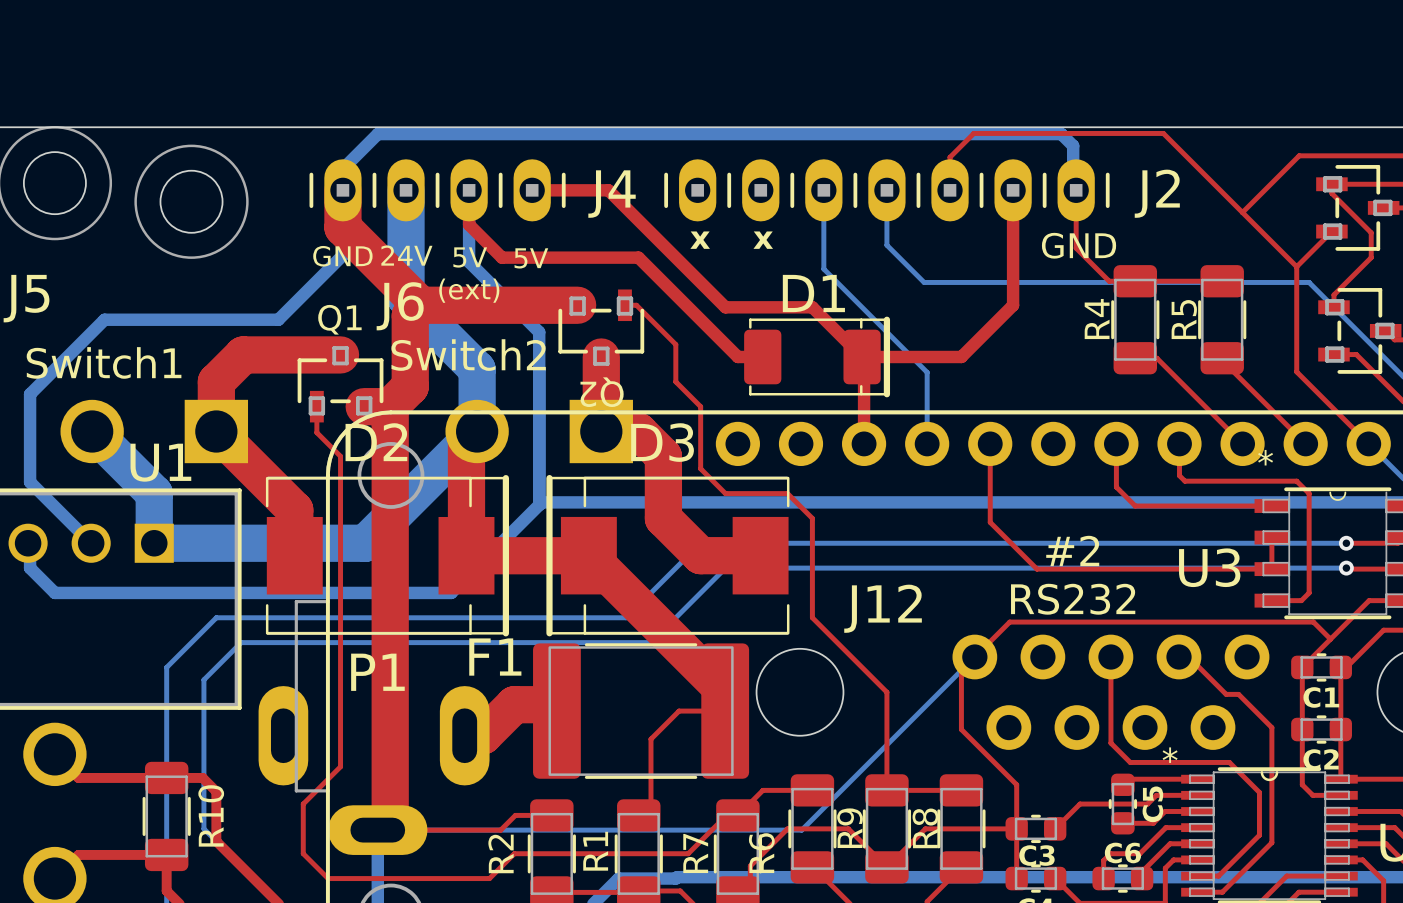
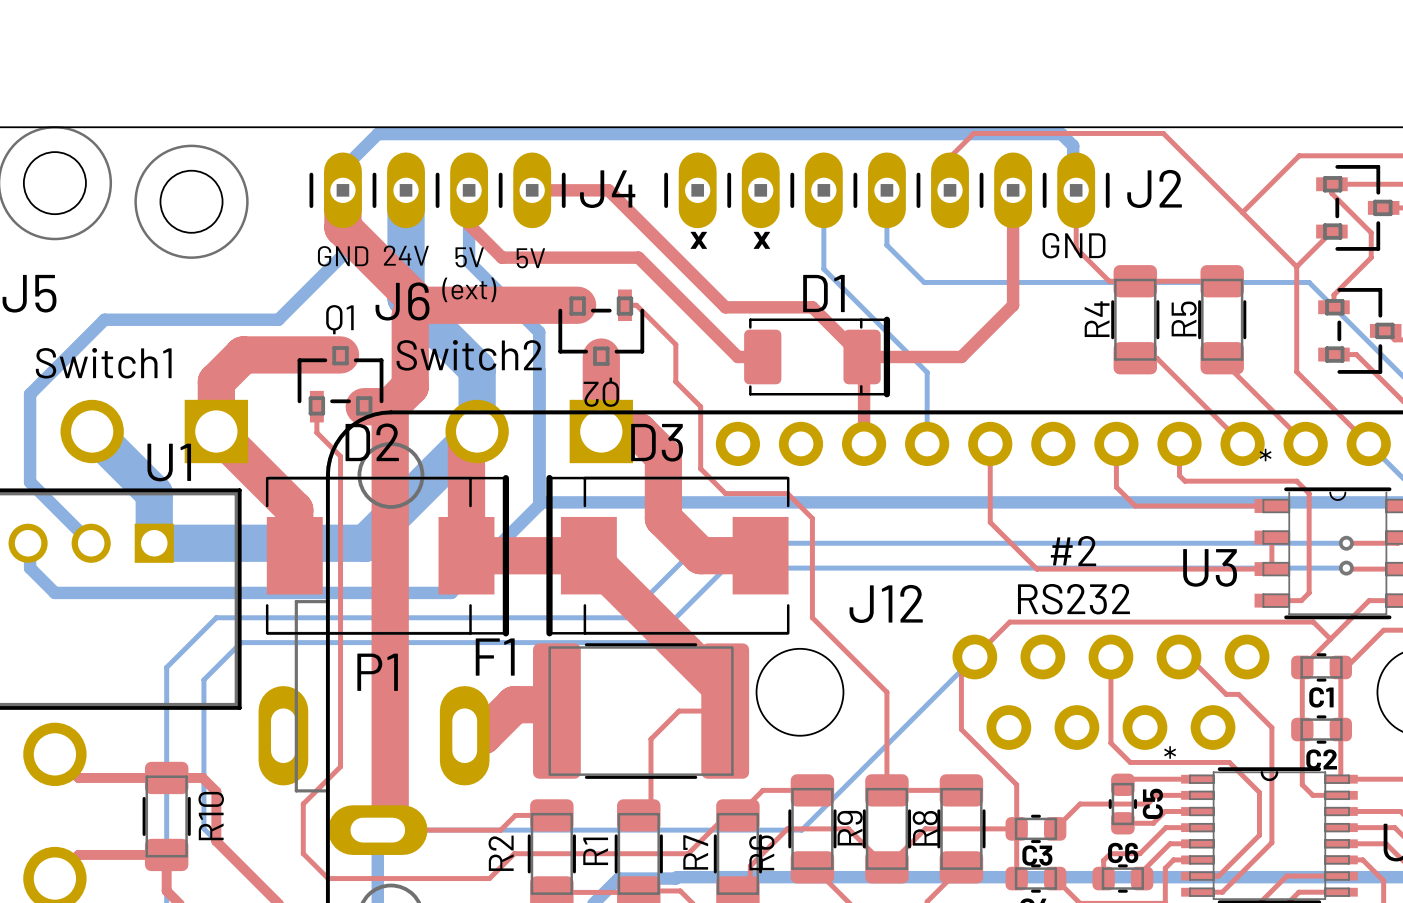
J4 footprint: [309, 159, 566, 222] -> [309, 152, 566, 229]
J2 footprint: [664, 159, 1110, 222] -> [664, 152, 1110, 229]

